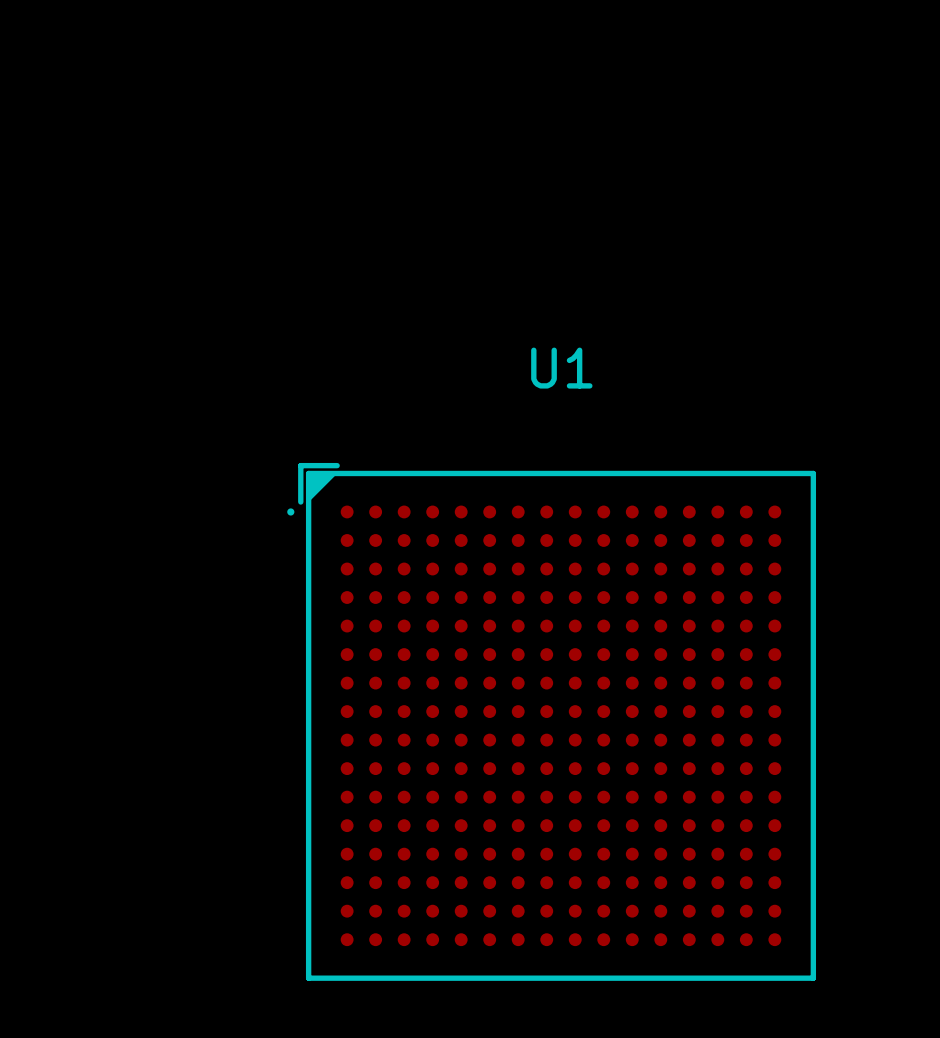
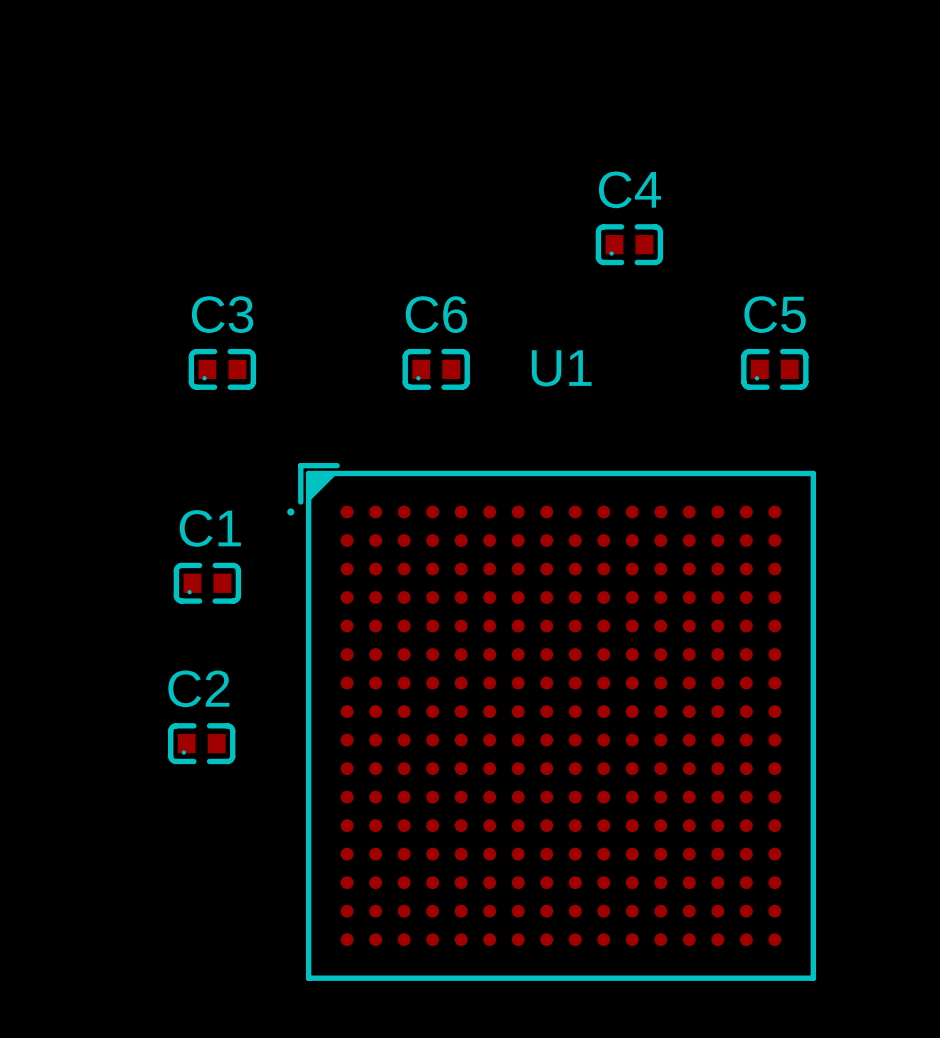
C4: none -> (629, 244)
C3: none -> (222, 369)
C6: none -> (436, 369)
C5: none -> (774, 369)
C1: none -> (207, 583)
C2: none -> (201, 743)

